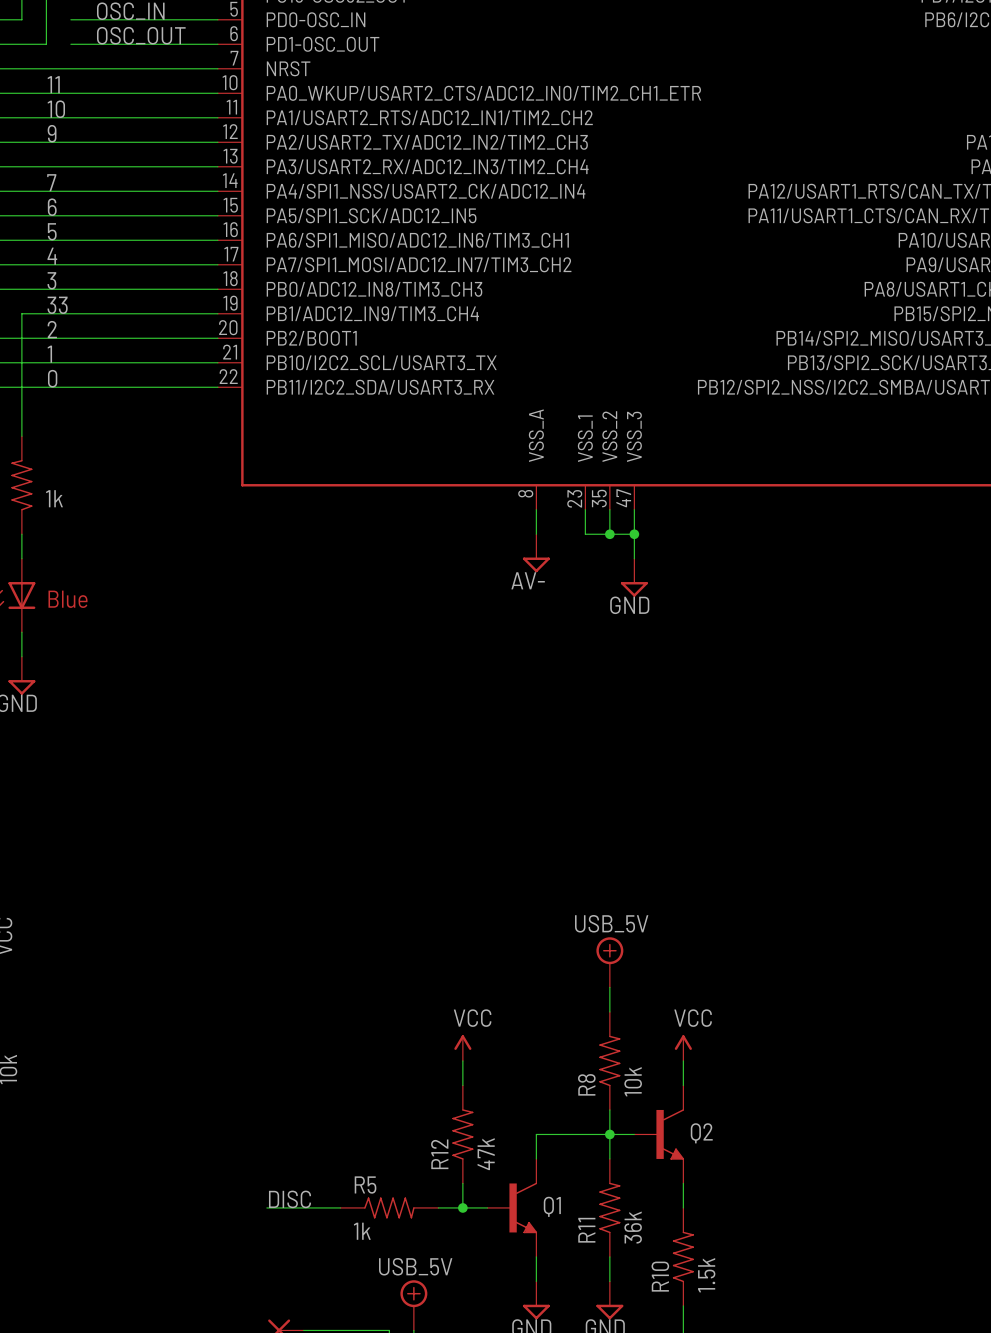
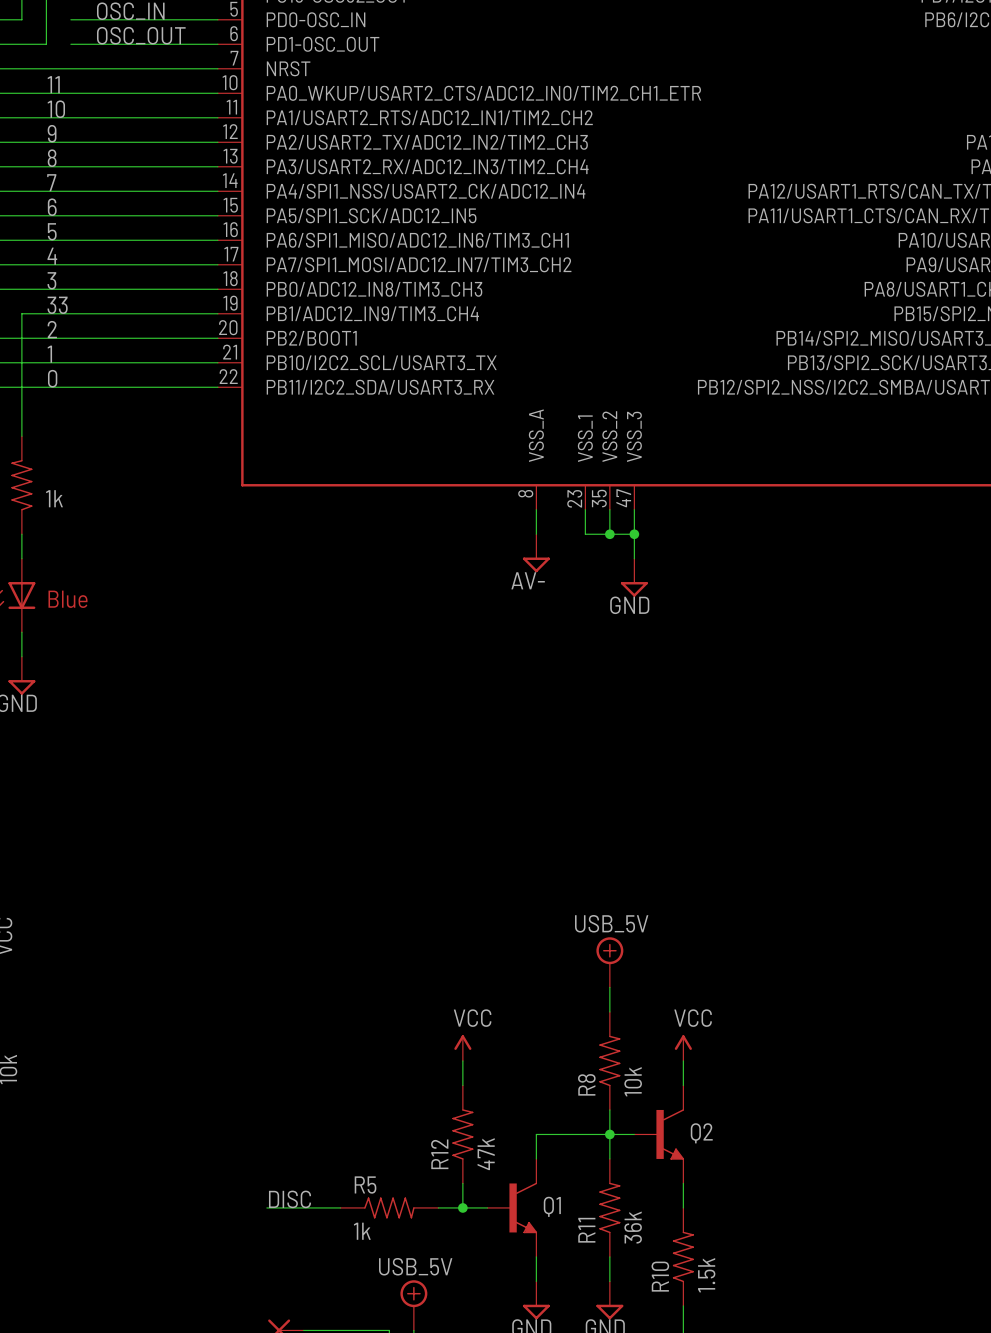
label: none -> 8 (52, 158)

